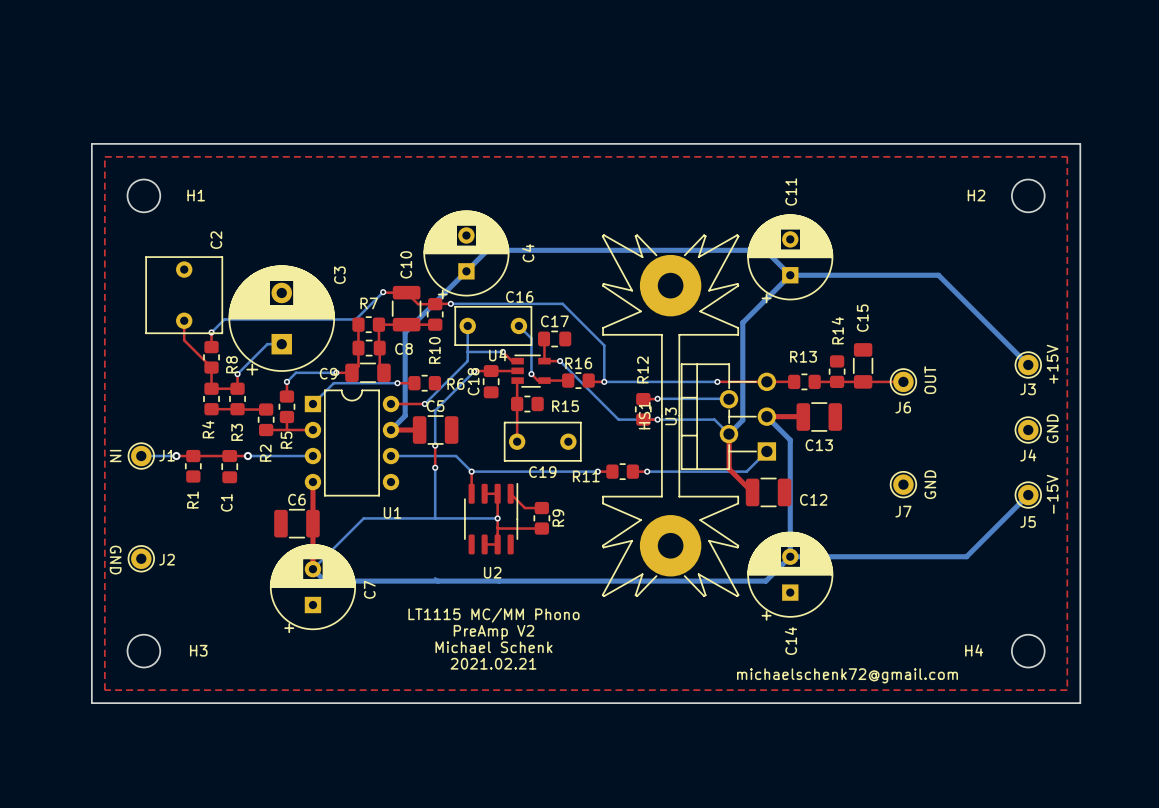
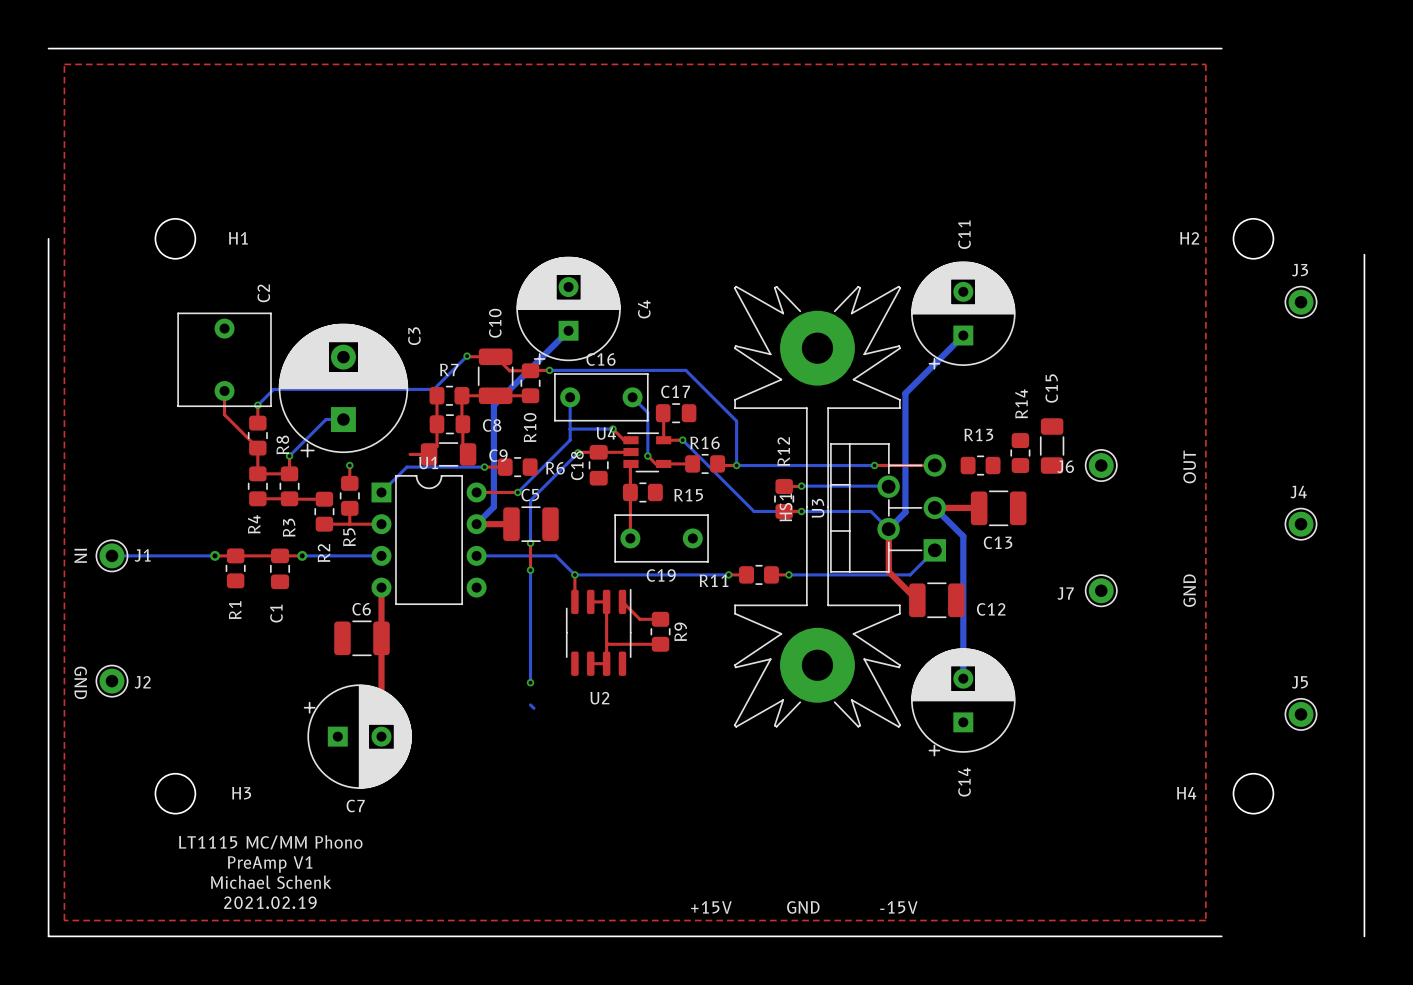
board edge: none -> (48, 48) (1221, 48)
board edge: (91, 143) (91, 703) (1080, 703) (1080, 143) (91, 143) -> none
top zone outline: (104, 156) (104, 690) (1067, 690) (1067, 156) (104, 156) -> (64, 64) (64, 920) (1205, 920) (1205, 64) (64, 64)
board edge: none -> (48, 238) (48, 936) (1221, 936)
board edge: none -> (1364, 254) (1364, 936)
bottom track: (466, 271) (487, 250) (765, 250) (790, 275) (938, 275) (1028, 364) -> none
C16 name position: C16 (519, 296) -> C16 (601, 359)
J3 position: (1028, 364) -> (1301, 302)
text: +15V (1052, 364) -> none
bottom track: (336, 372) (296, 372) (286, 381) -> none
via: (336, 372) -> none
C9 name position: C9 (328, 373) -> C9 (498, 455)
text position: OUT (930, 380) -> OUT (1189, 466)
top track: (766, 381) (794, 381) -> none
top track: (814, 381) (903, 381) -> none
J3 name position: J3 (1028, 389) -> J3 (1300, 270)
J6 name position: J6 (903, 407) -> J6 (1065, 466)
text: GND (1052, 428) -> none
J4 position: (1028, 430) -> (1301, 524)
J4 name position: J4 (1028, 455) -> J4 (1298, 492)
bottom track: none -> (111, 555) (172, 555)
text position: IN (115, 456) -> IN (80, 555)
J1 position: (141, 456) -> (111, 555)
text position: GND (930, 484) -> GND (1189, 590)
text: -15V (1052, 494) -> none
bottom track: (1028, 495) (966, 556) (790, 556) (765, 581) (324, 581) (312, 569) (363, 518) (497, 518) -> none
J5 position: (1028, 495) -> (1301, 714)
J7 name position: J7 (903, 511) -> J7 (1065, 593)
U1 name position: U1 (392, 512) -> U1 (428, 462)
bottom track: none -> (530, 631) (530, 682)
via: (497, 518) -> none
J5 name position: J5 (1028, 521) -> J5 (1299, 682)
J2 position: (141, 558) -> (111, 681)
text position: GND (115, 560) -> GND (80, 682)
via: none -> (530, 682)
C7 rotation: 0° (312, 588) -> 90° clockwise (357, 736)
text: LT1115 MC/MM Phono (493, 615) -> none
text: PreAmp V2 (493, 632) -> none
text: Michael Schenk (493, 647) -> none
text: 2021.02.21 (493, 663) -> none
text: michaelschenk72@gmail.com (847, 675) -> none
text: none -> LT1115 MC/MM Phono (270, 842)
text: none -> PreAmp V1 (270, 864)
text: none -> Michael Schenk (271, 882)
text: none -> 2021.02.19 (270, 902)
text: none -> +15V (711, 907)
text: none -> GND (803, 907)
text: none -> -15V (898, 907)

